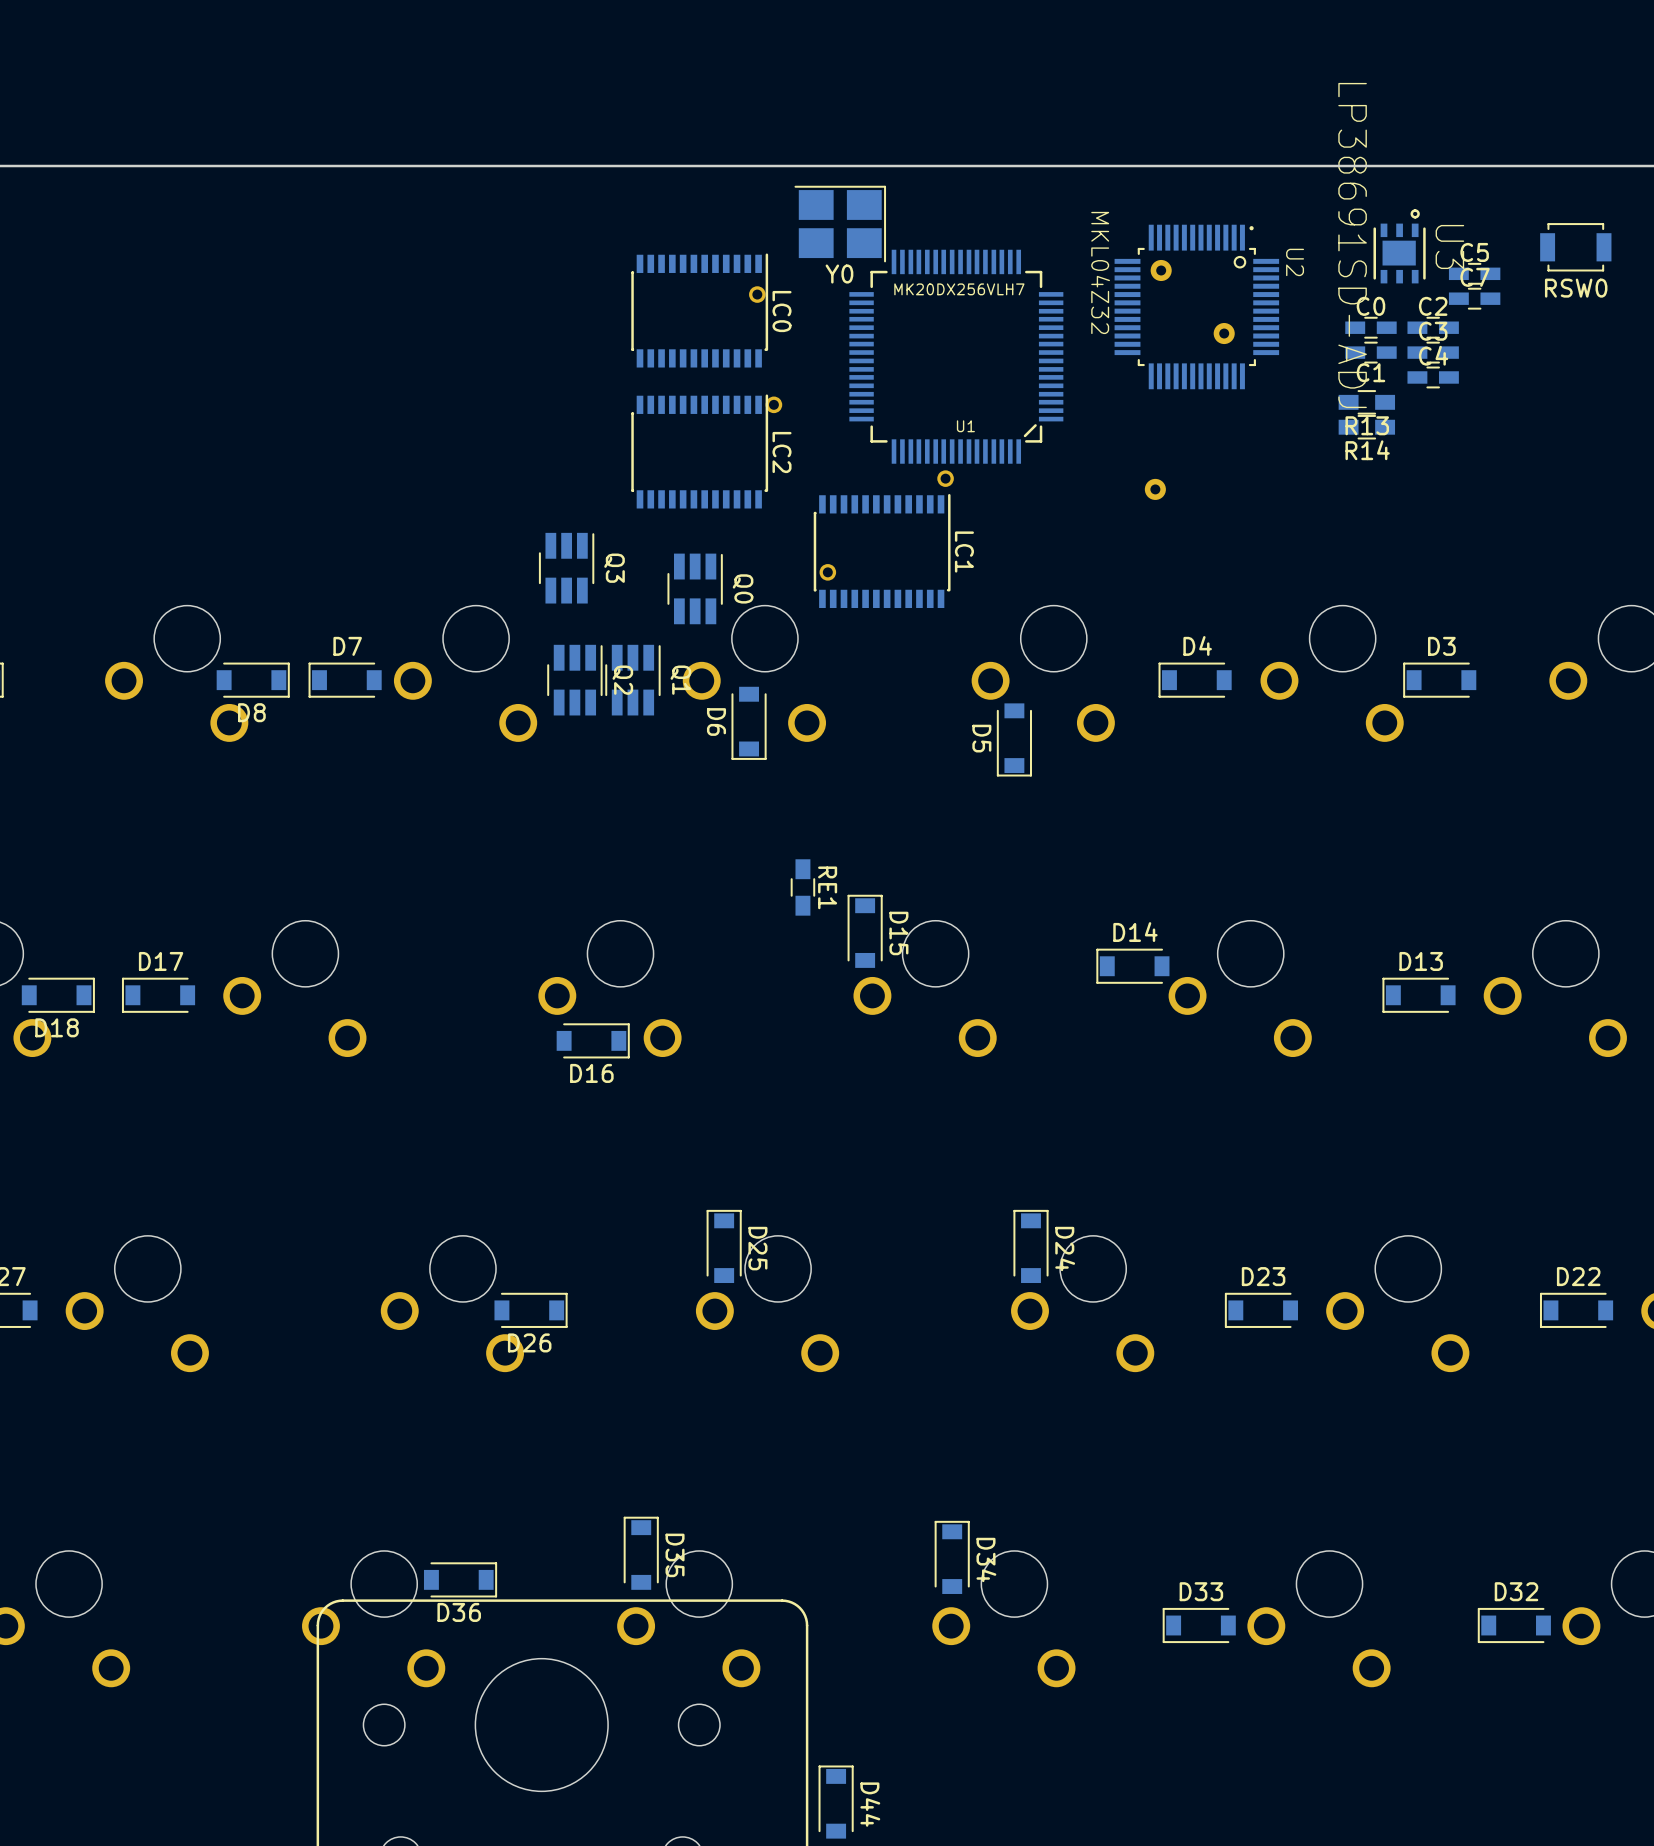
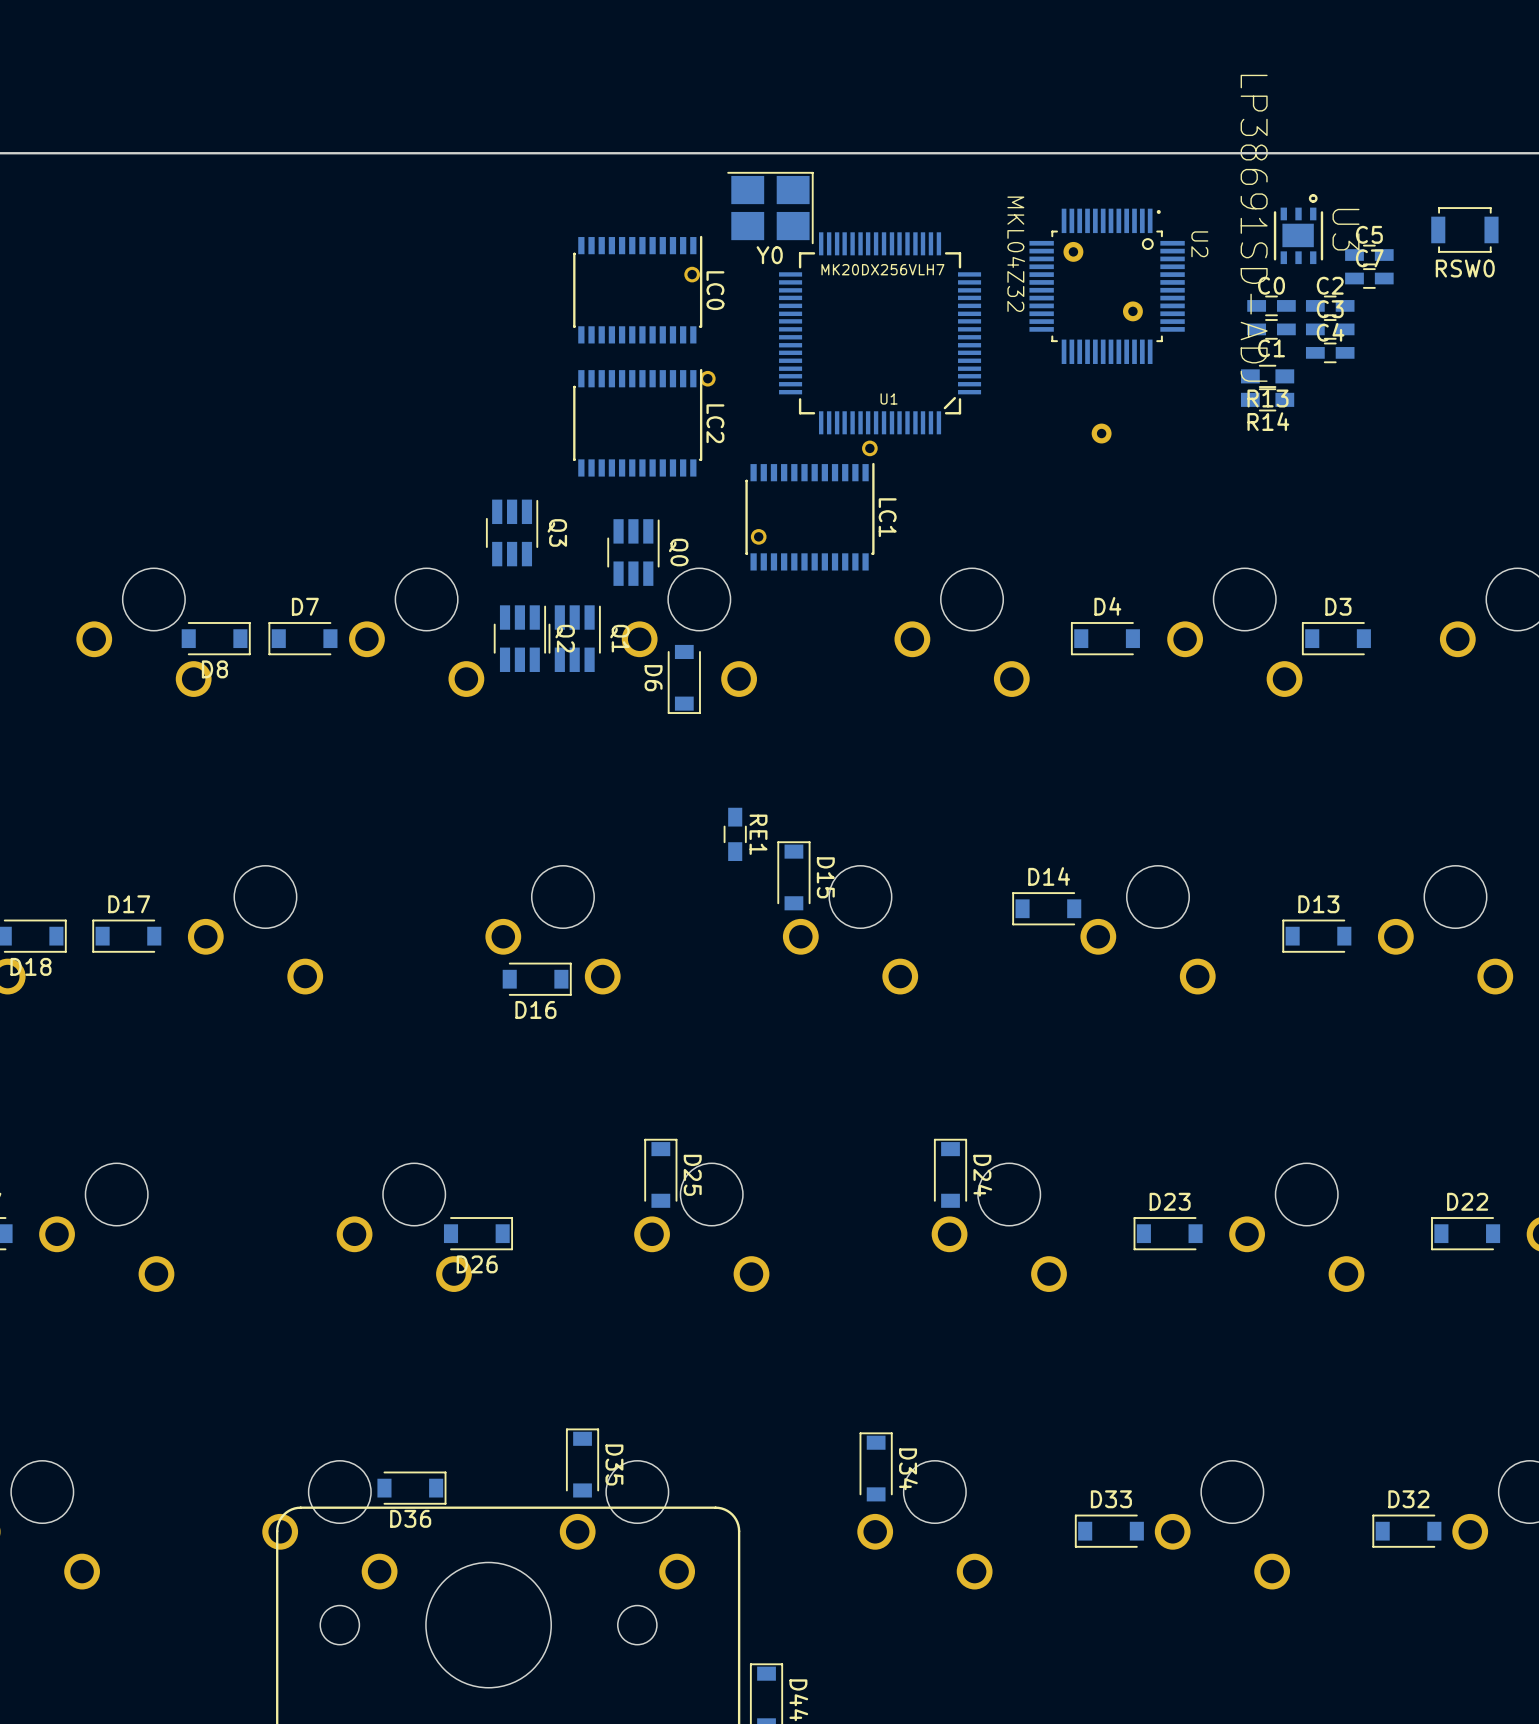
part position: (1155, 489) -> (1101, 433)
D5: (1014, 739) -> none

